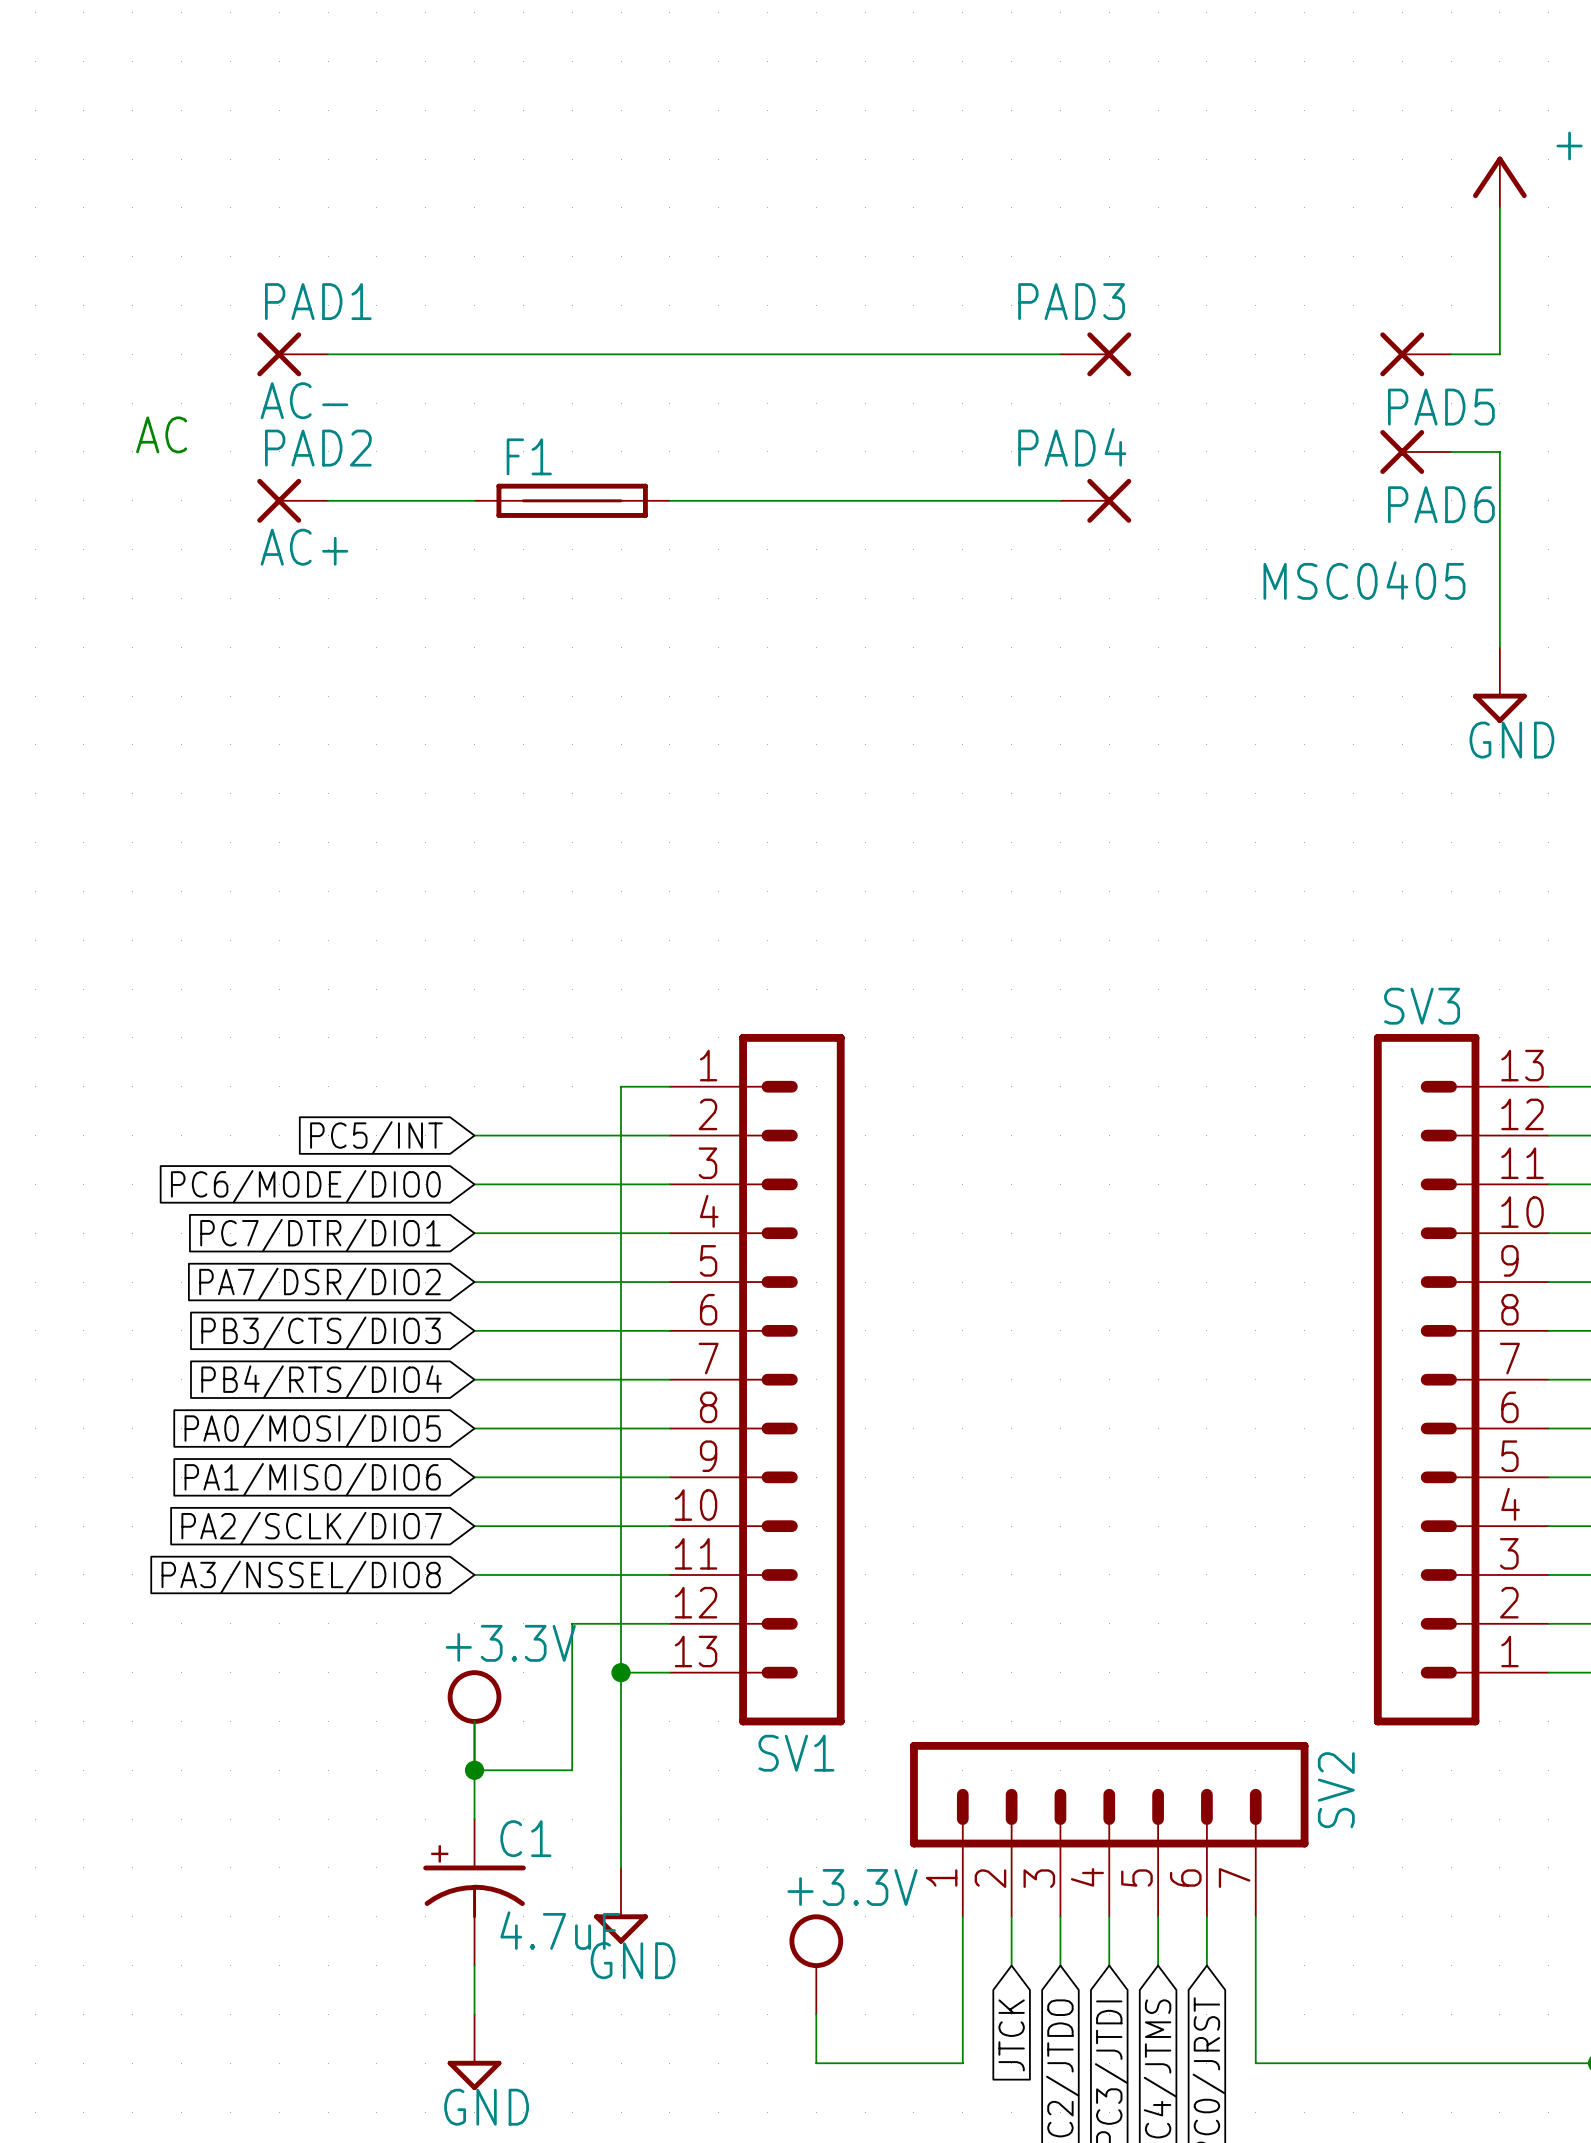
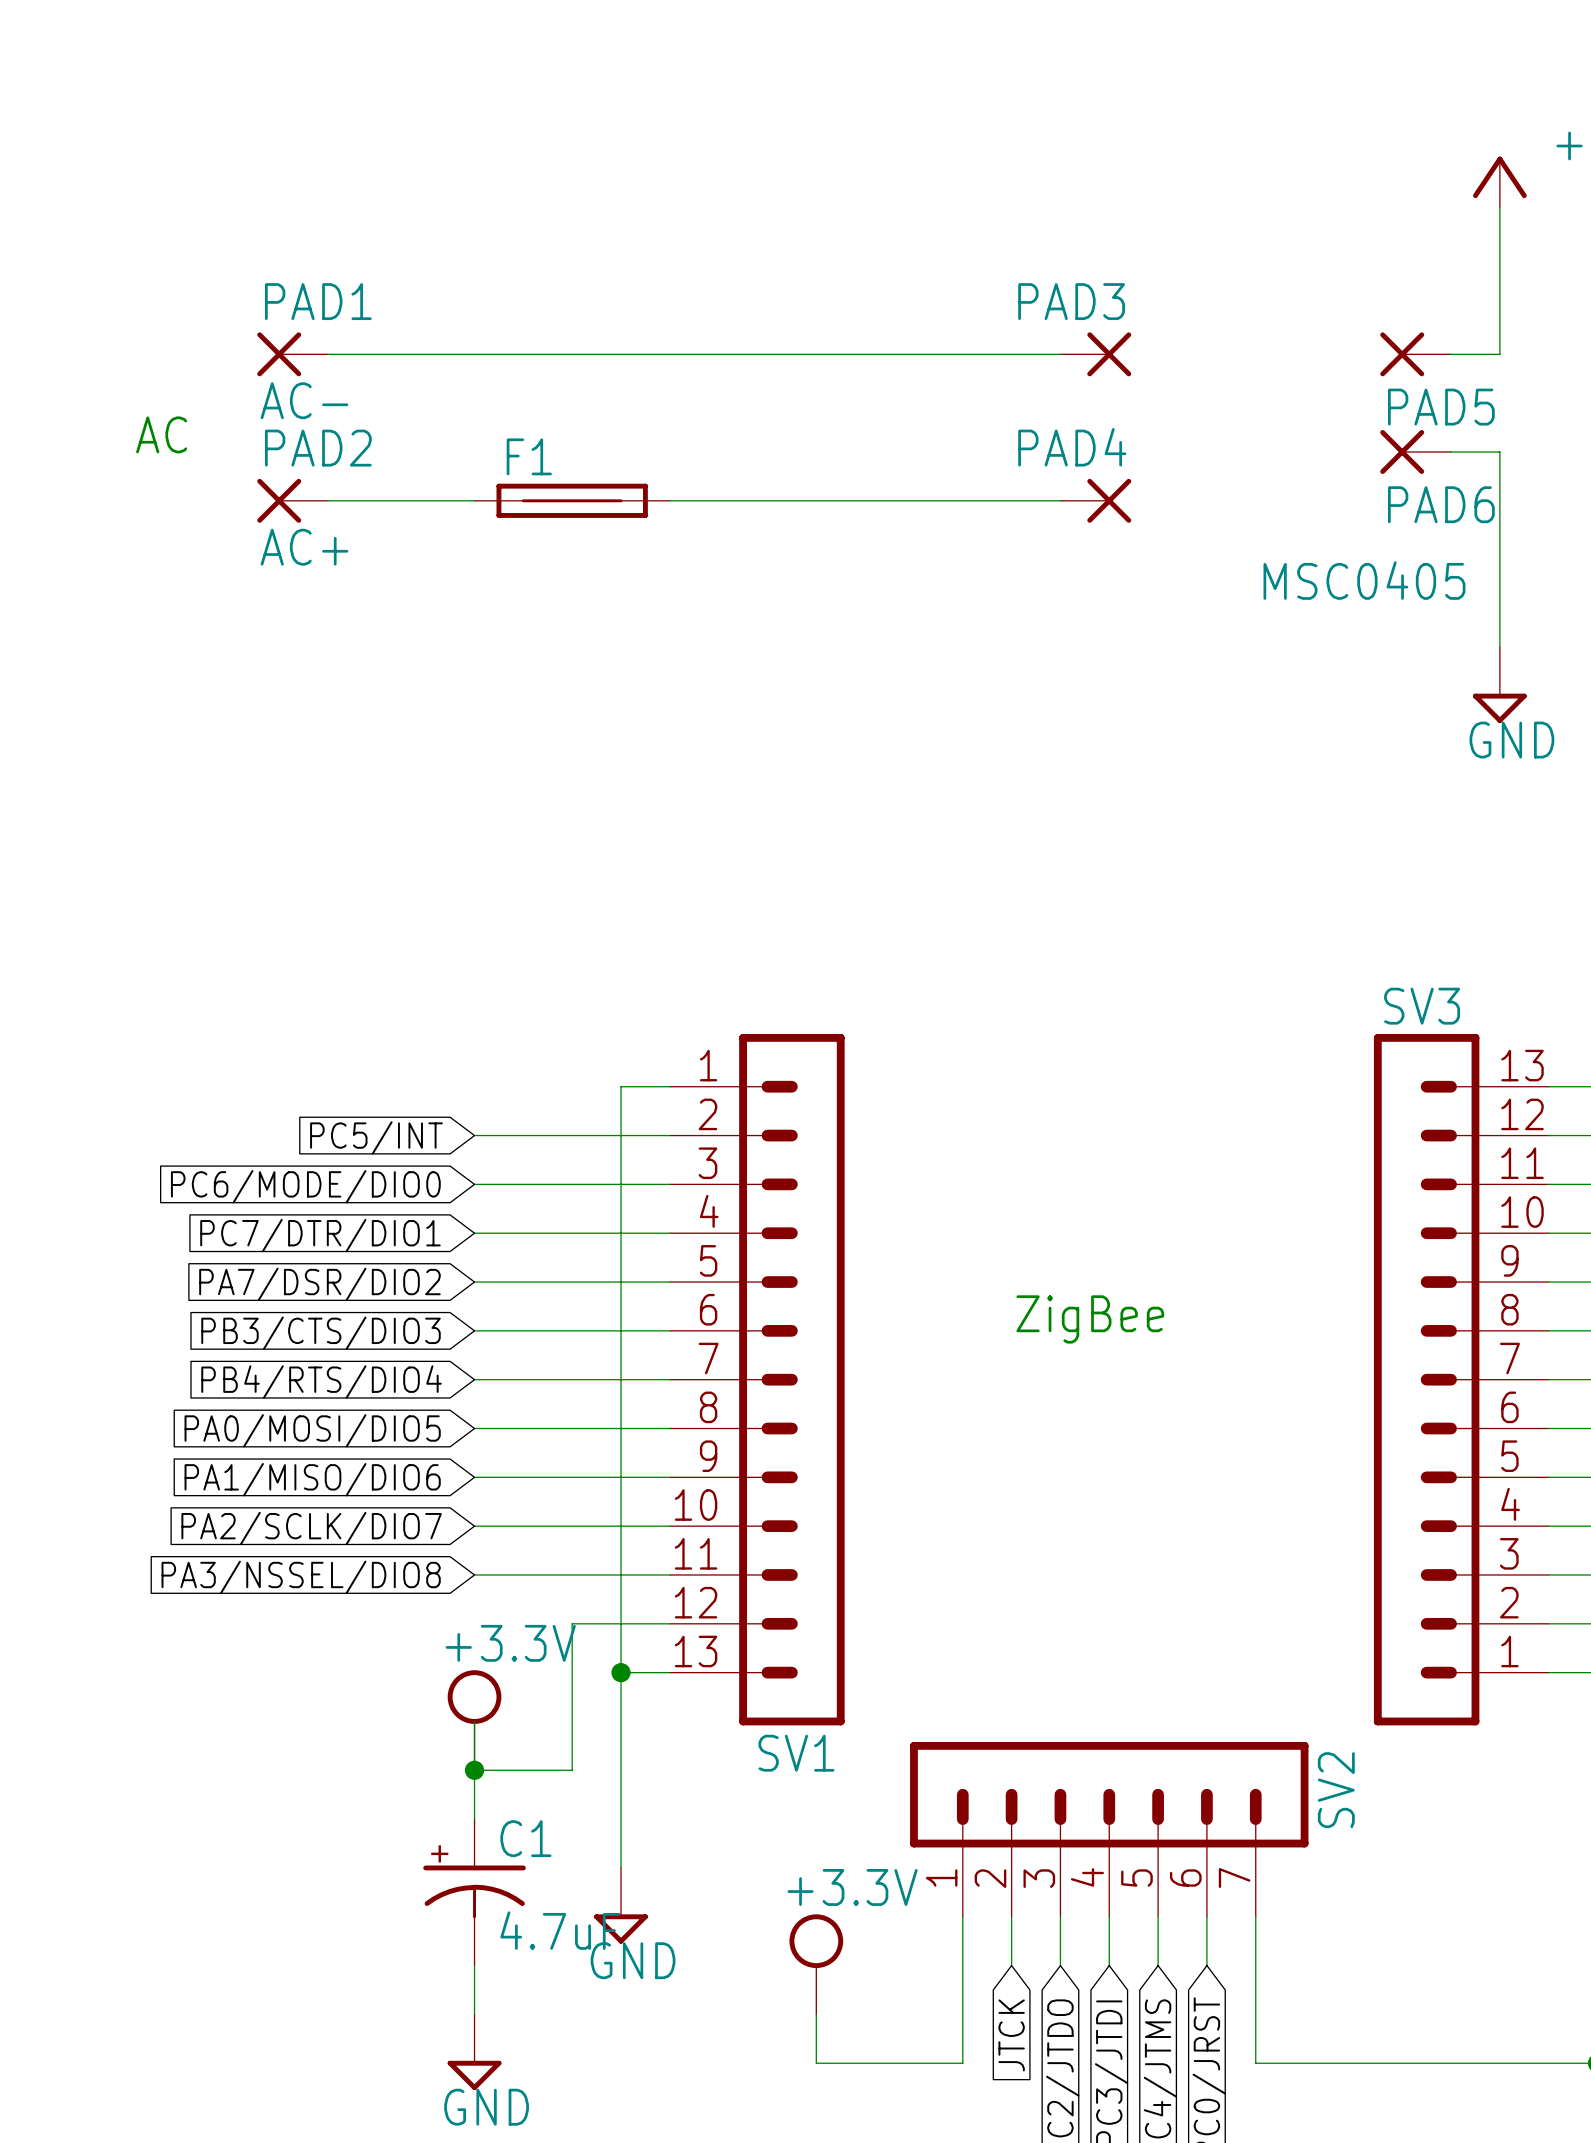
text: none -> ZigBee (1090, 1319)

